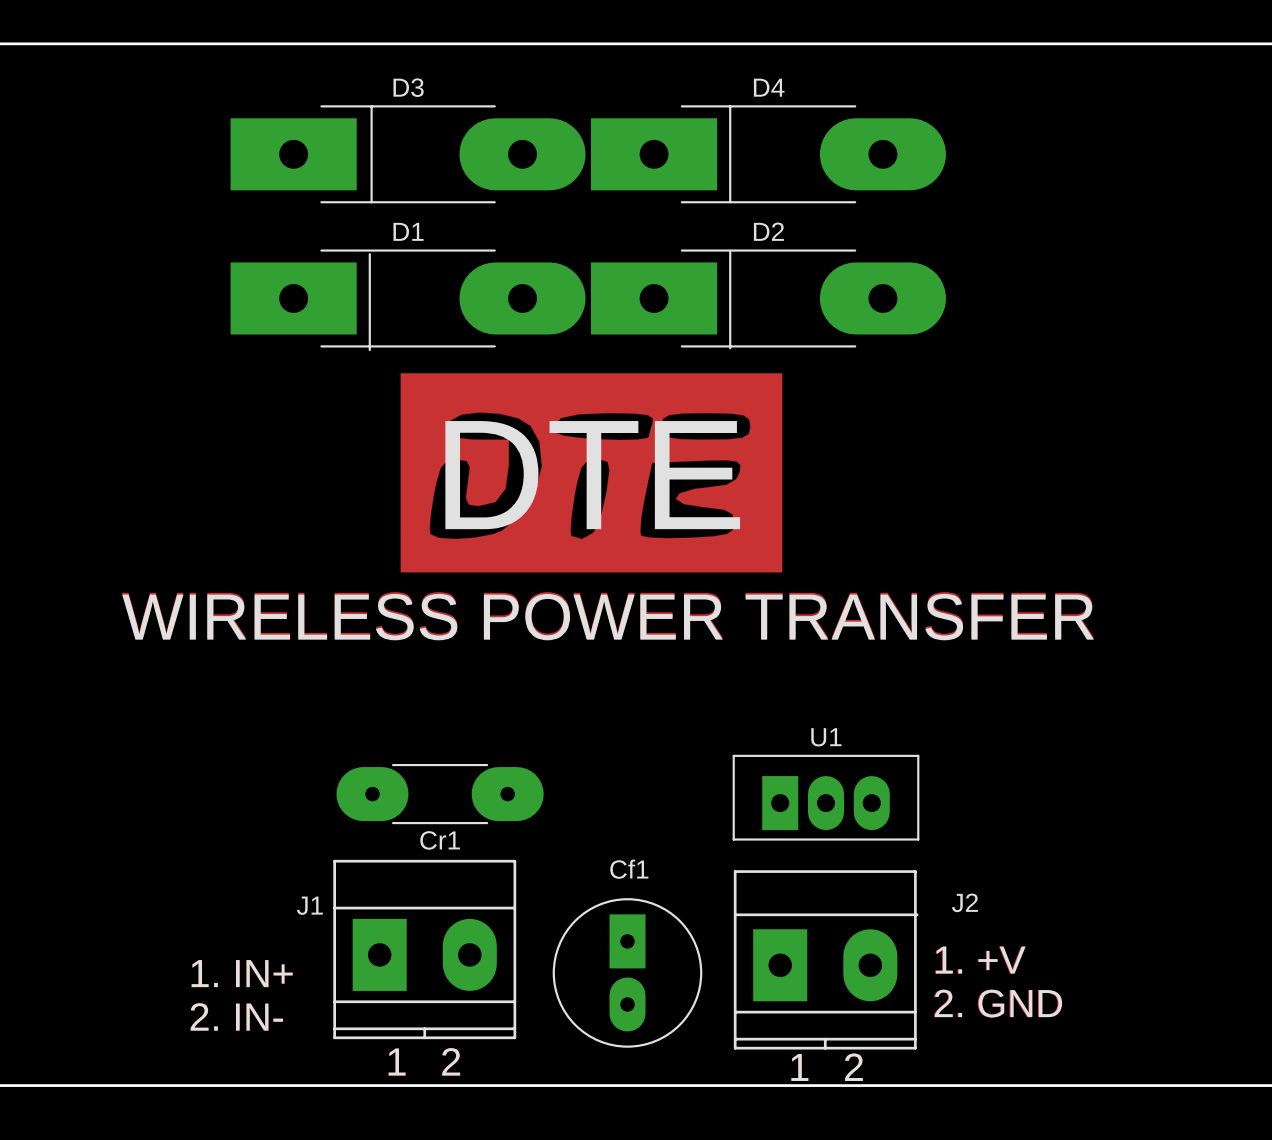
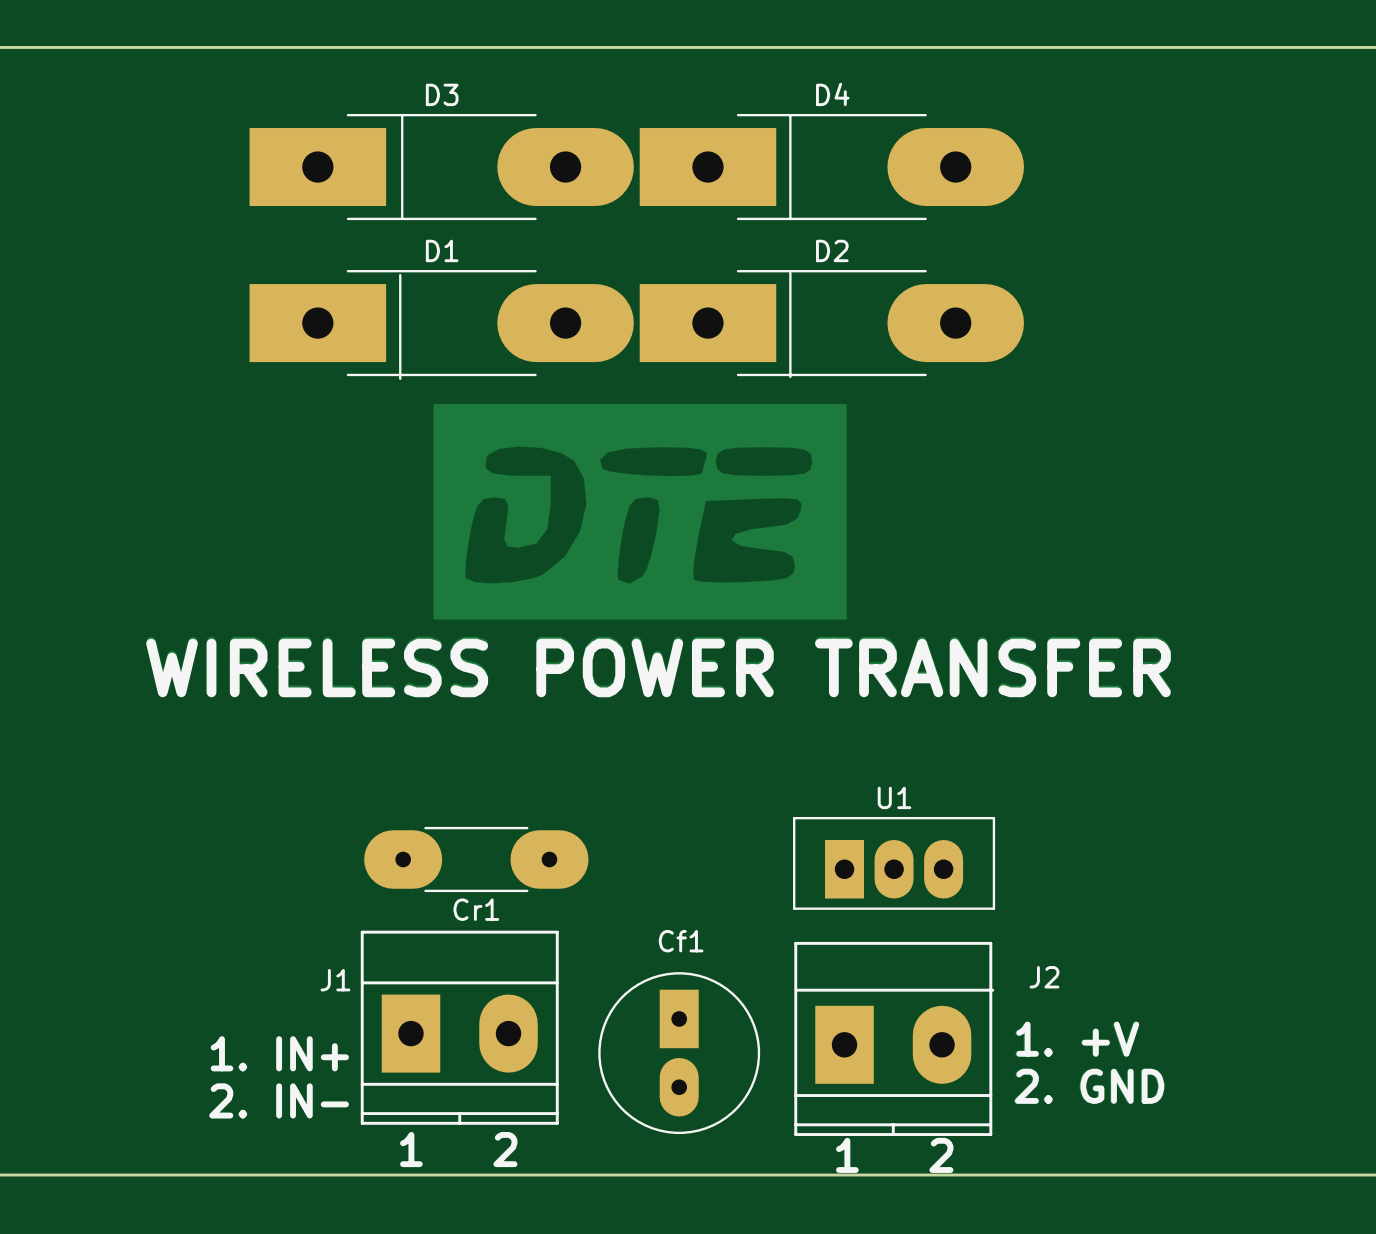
text: DTE (592, 475) -> none

